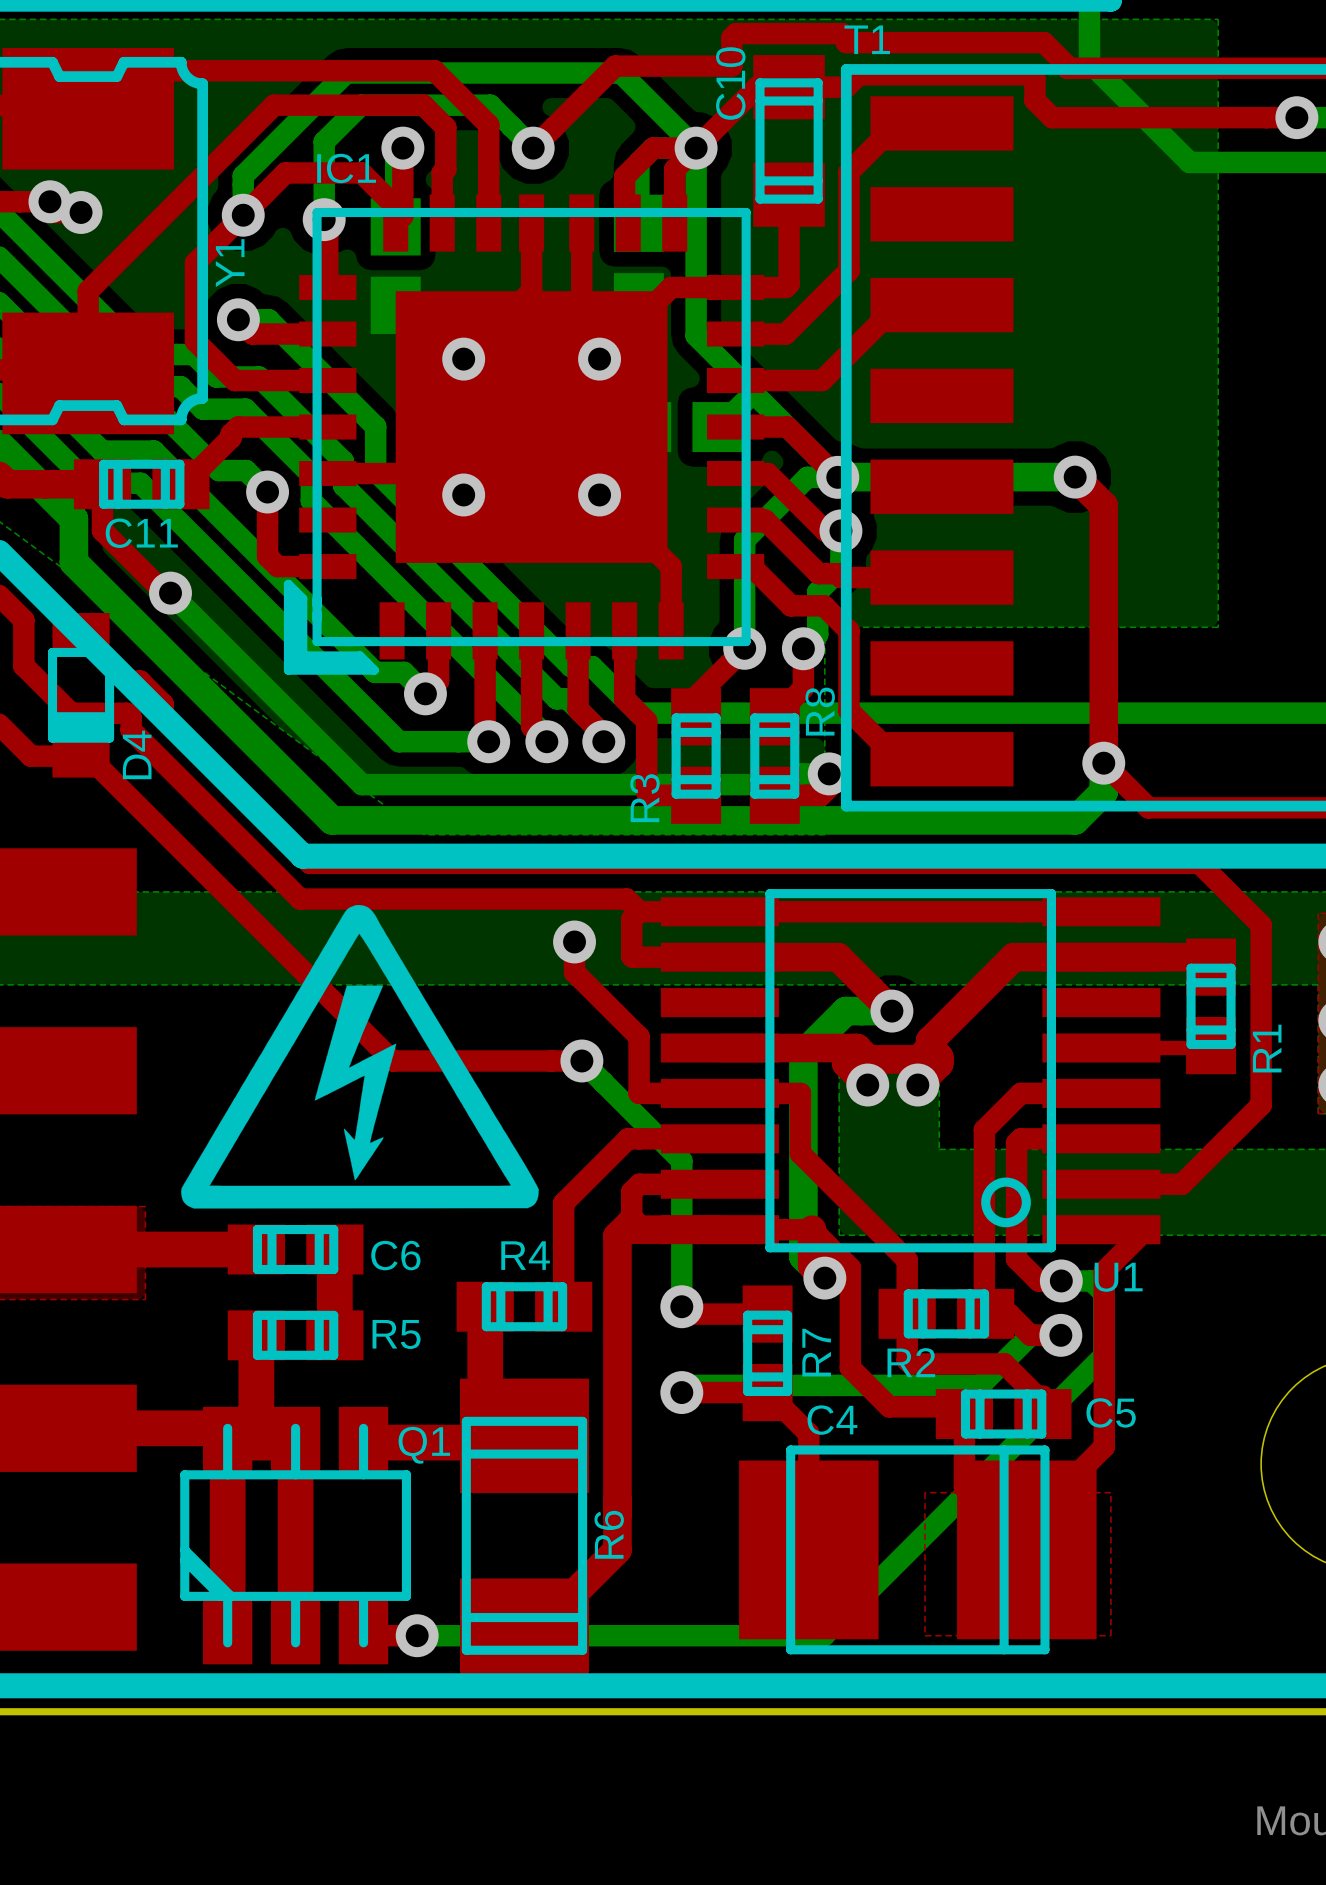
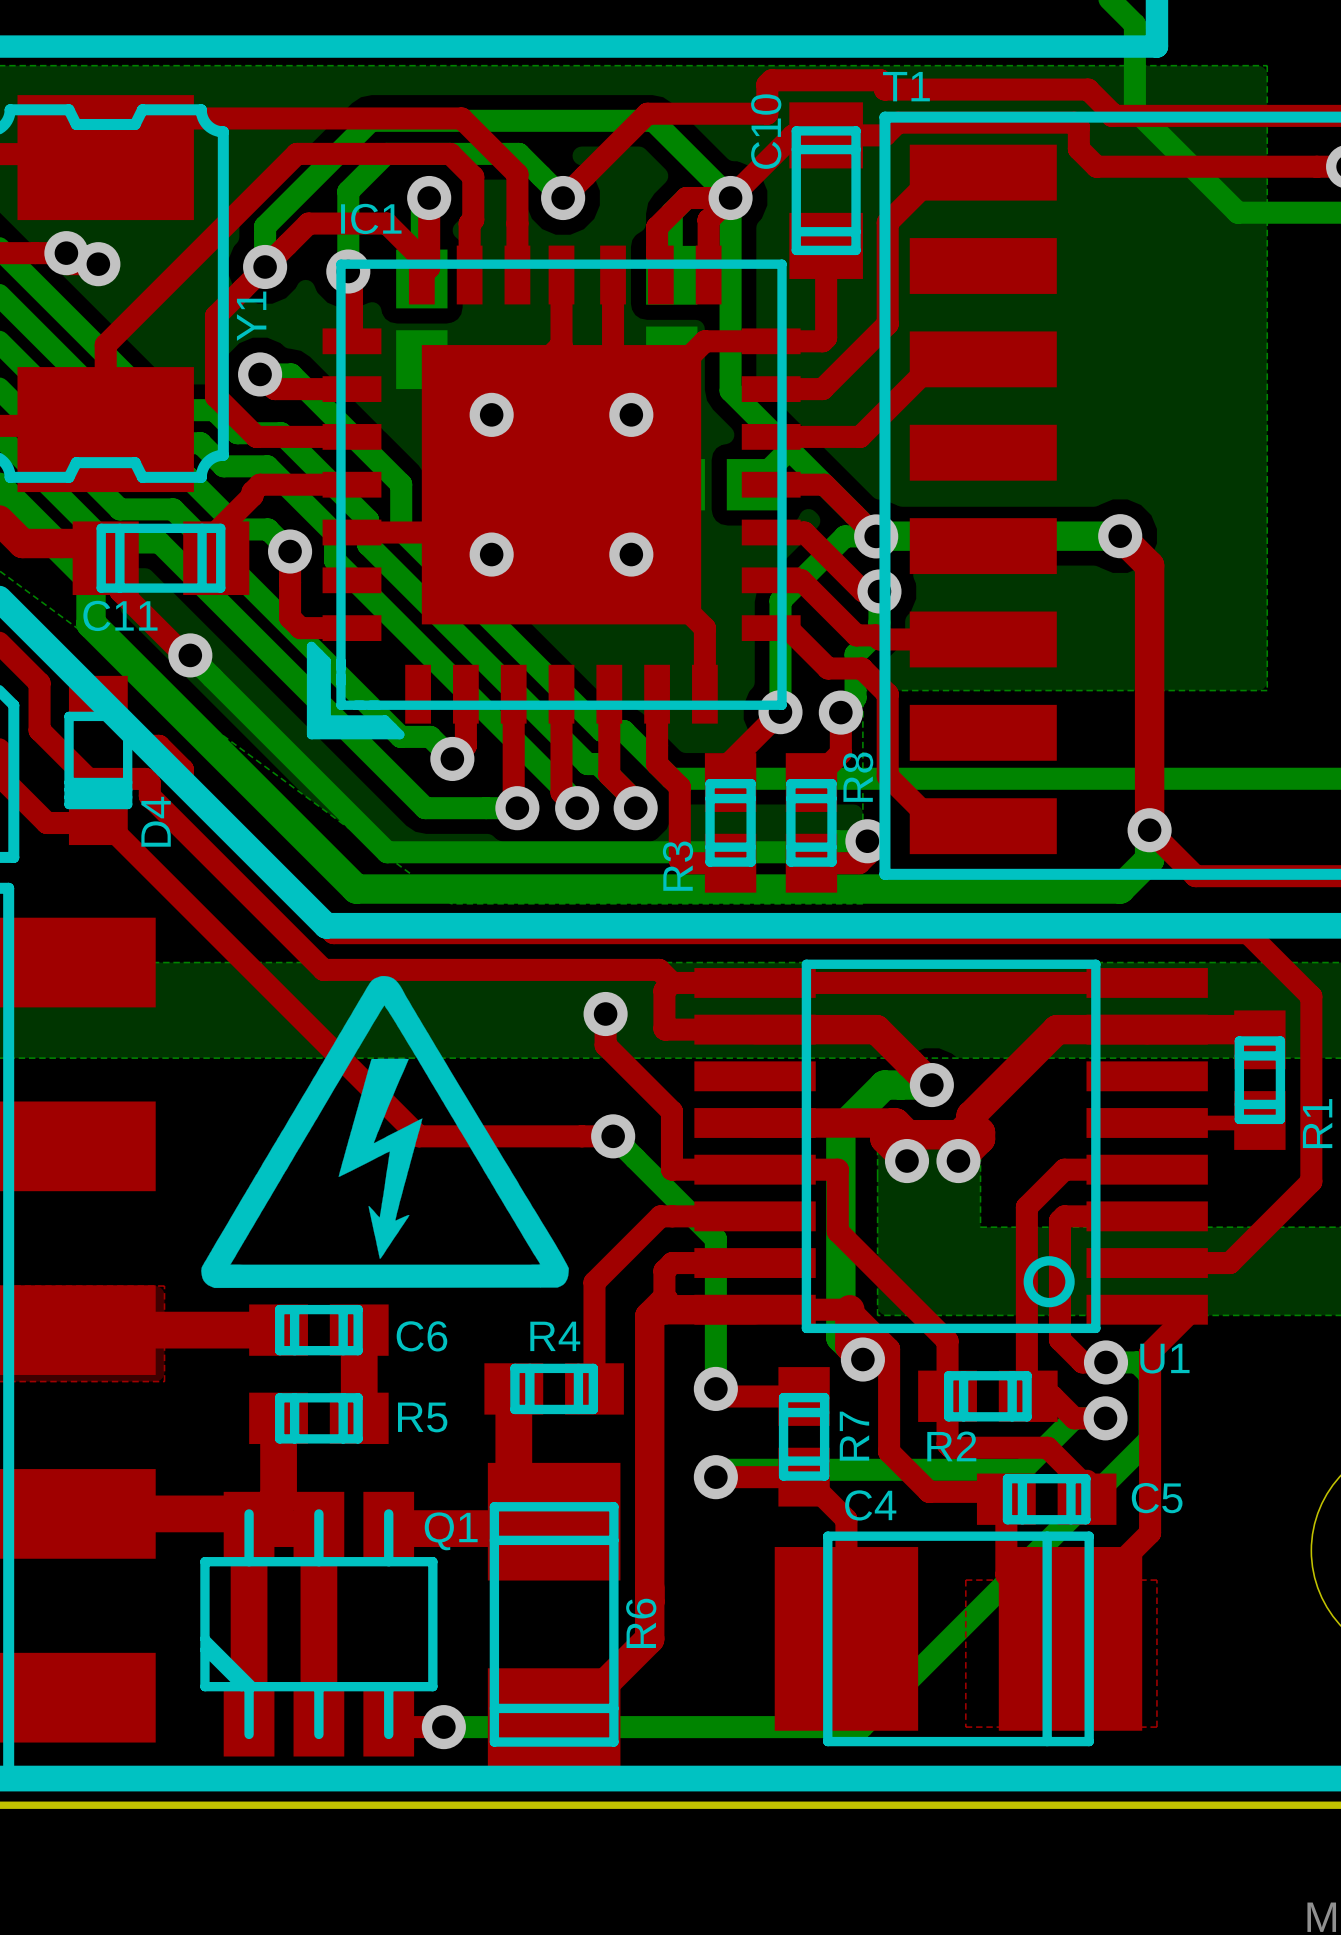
C11 footprint: [73, 459, 210, 510] -> [72, 521, 250, 596]
C11 name position: C11 (141, 533) -> C11 (120, 615)

